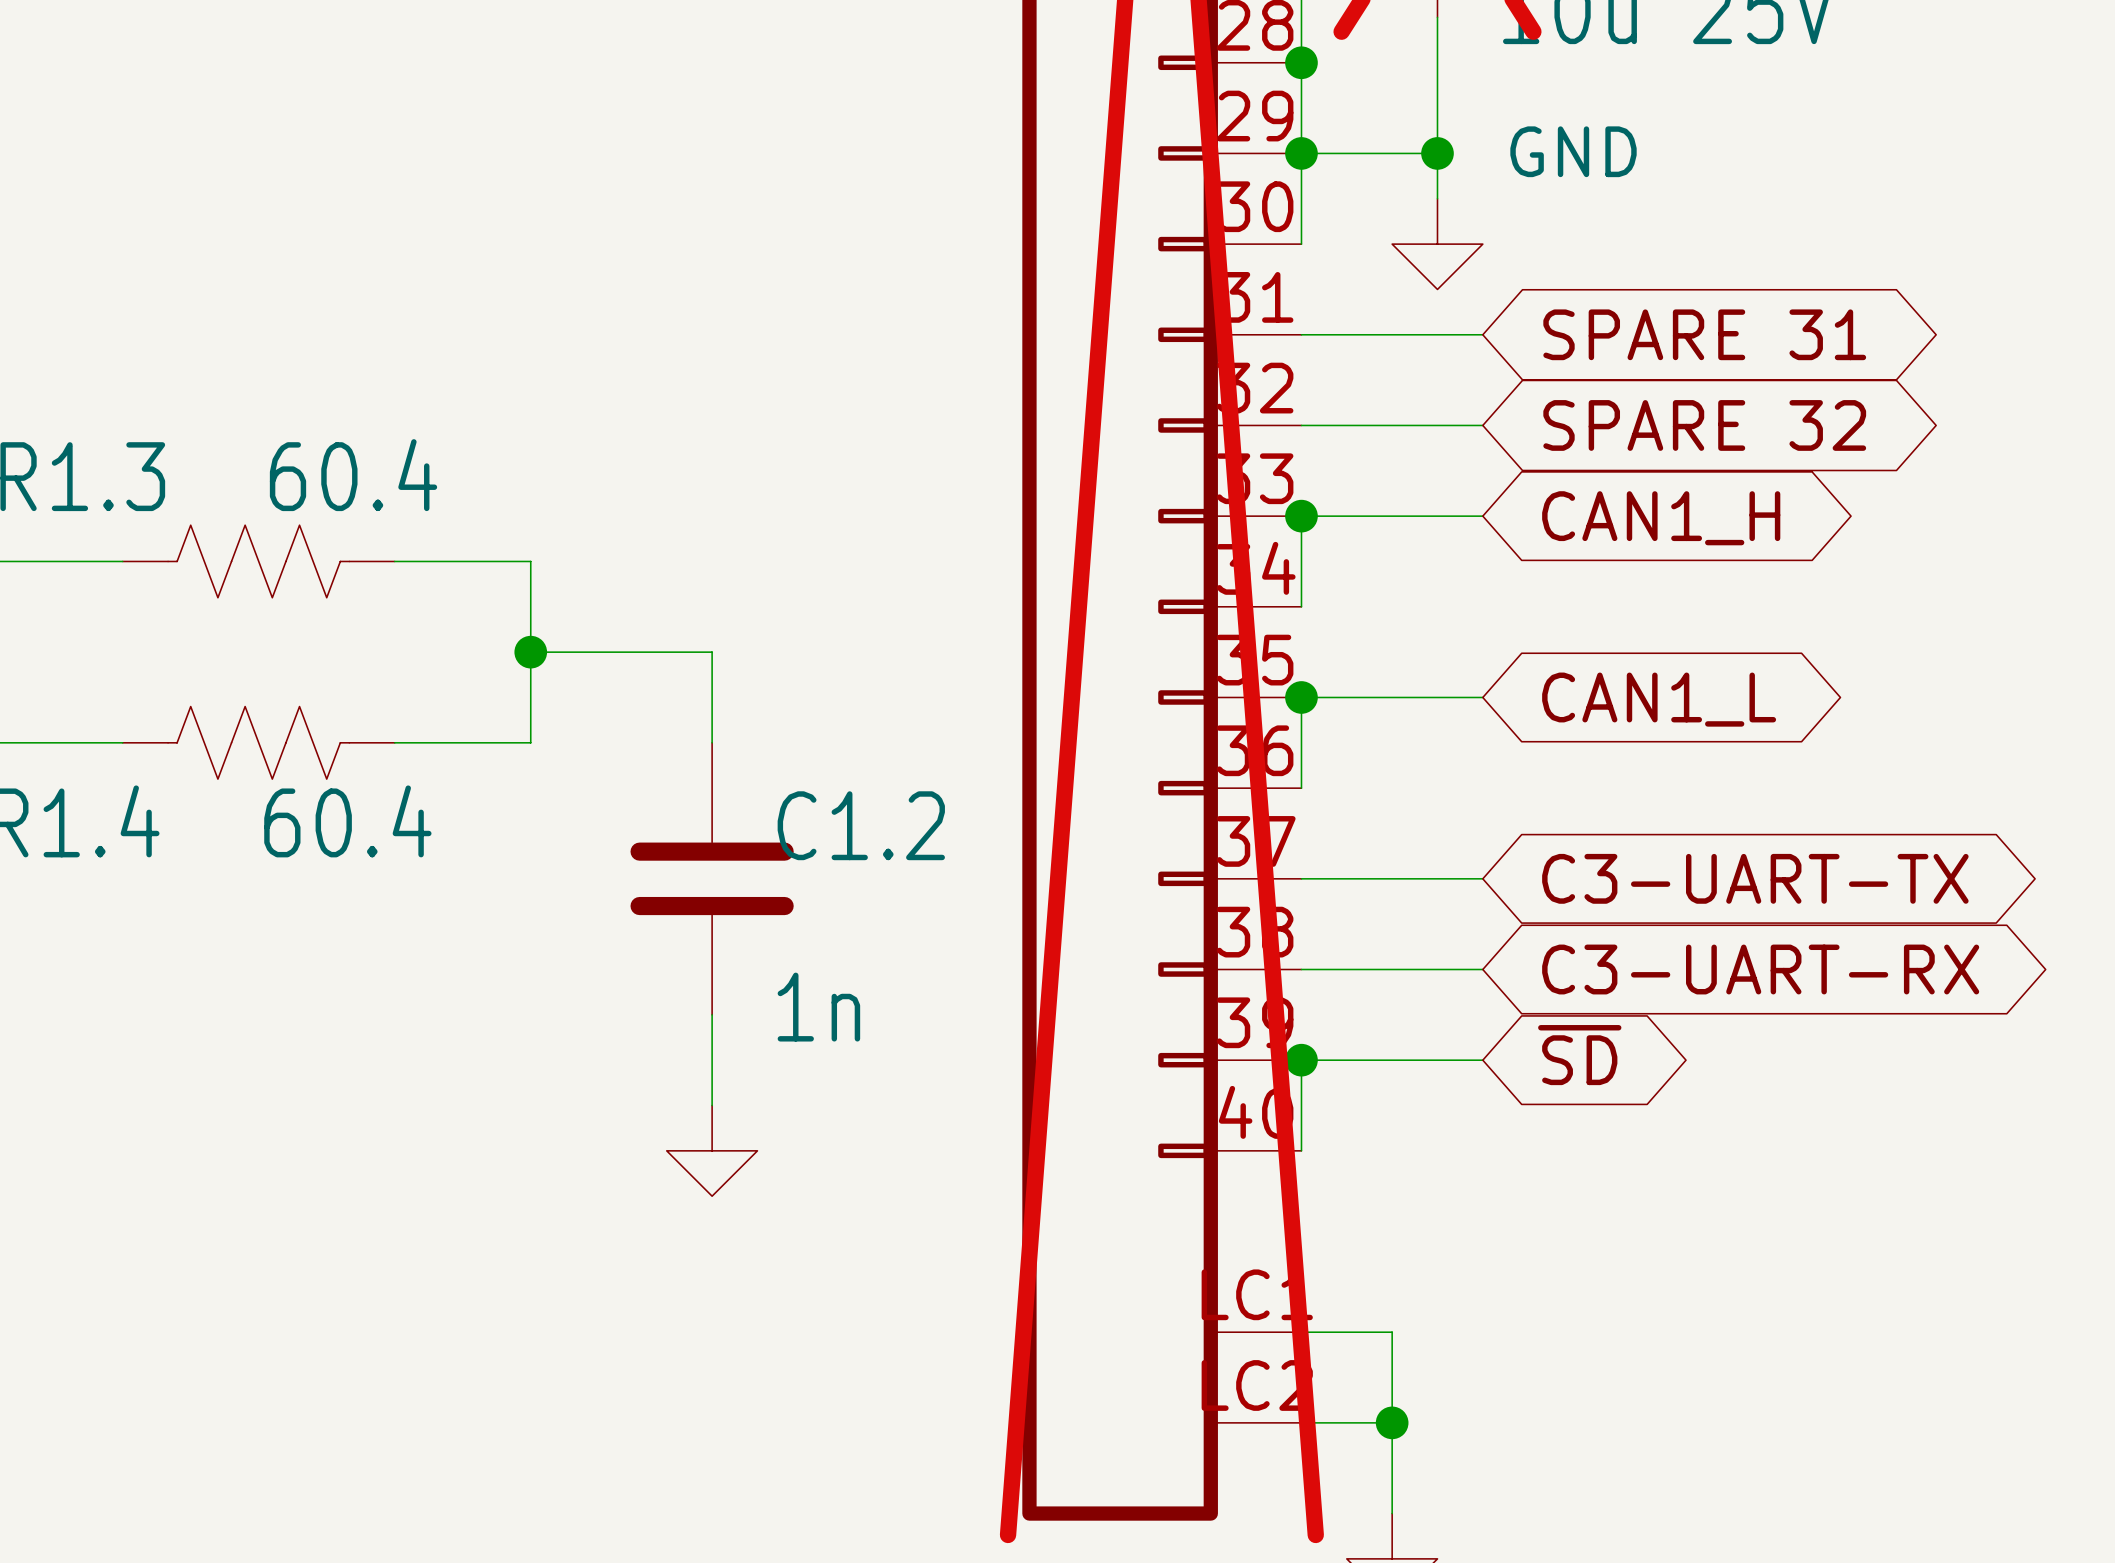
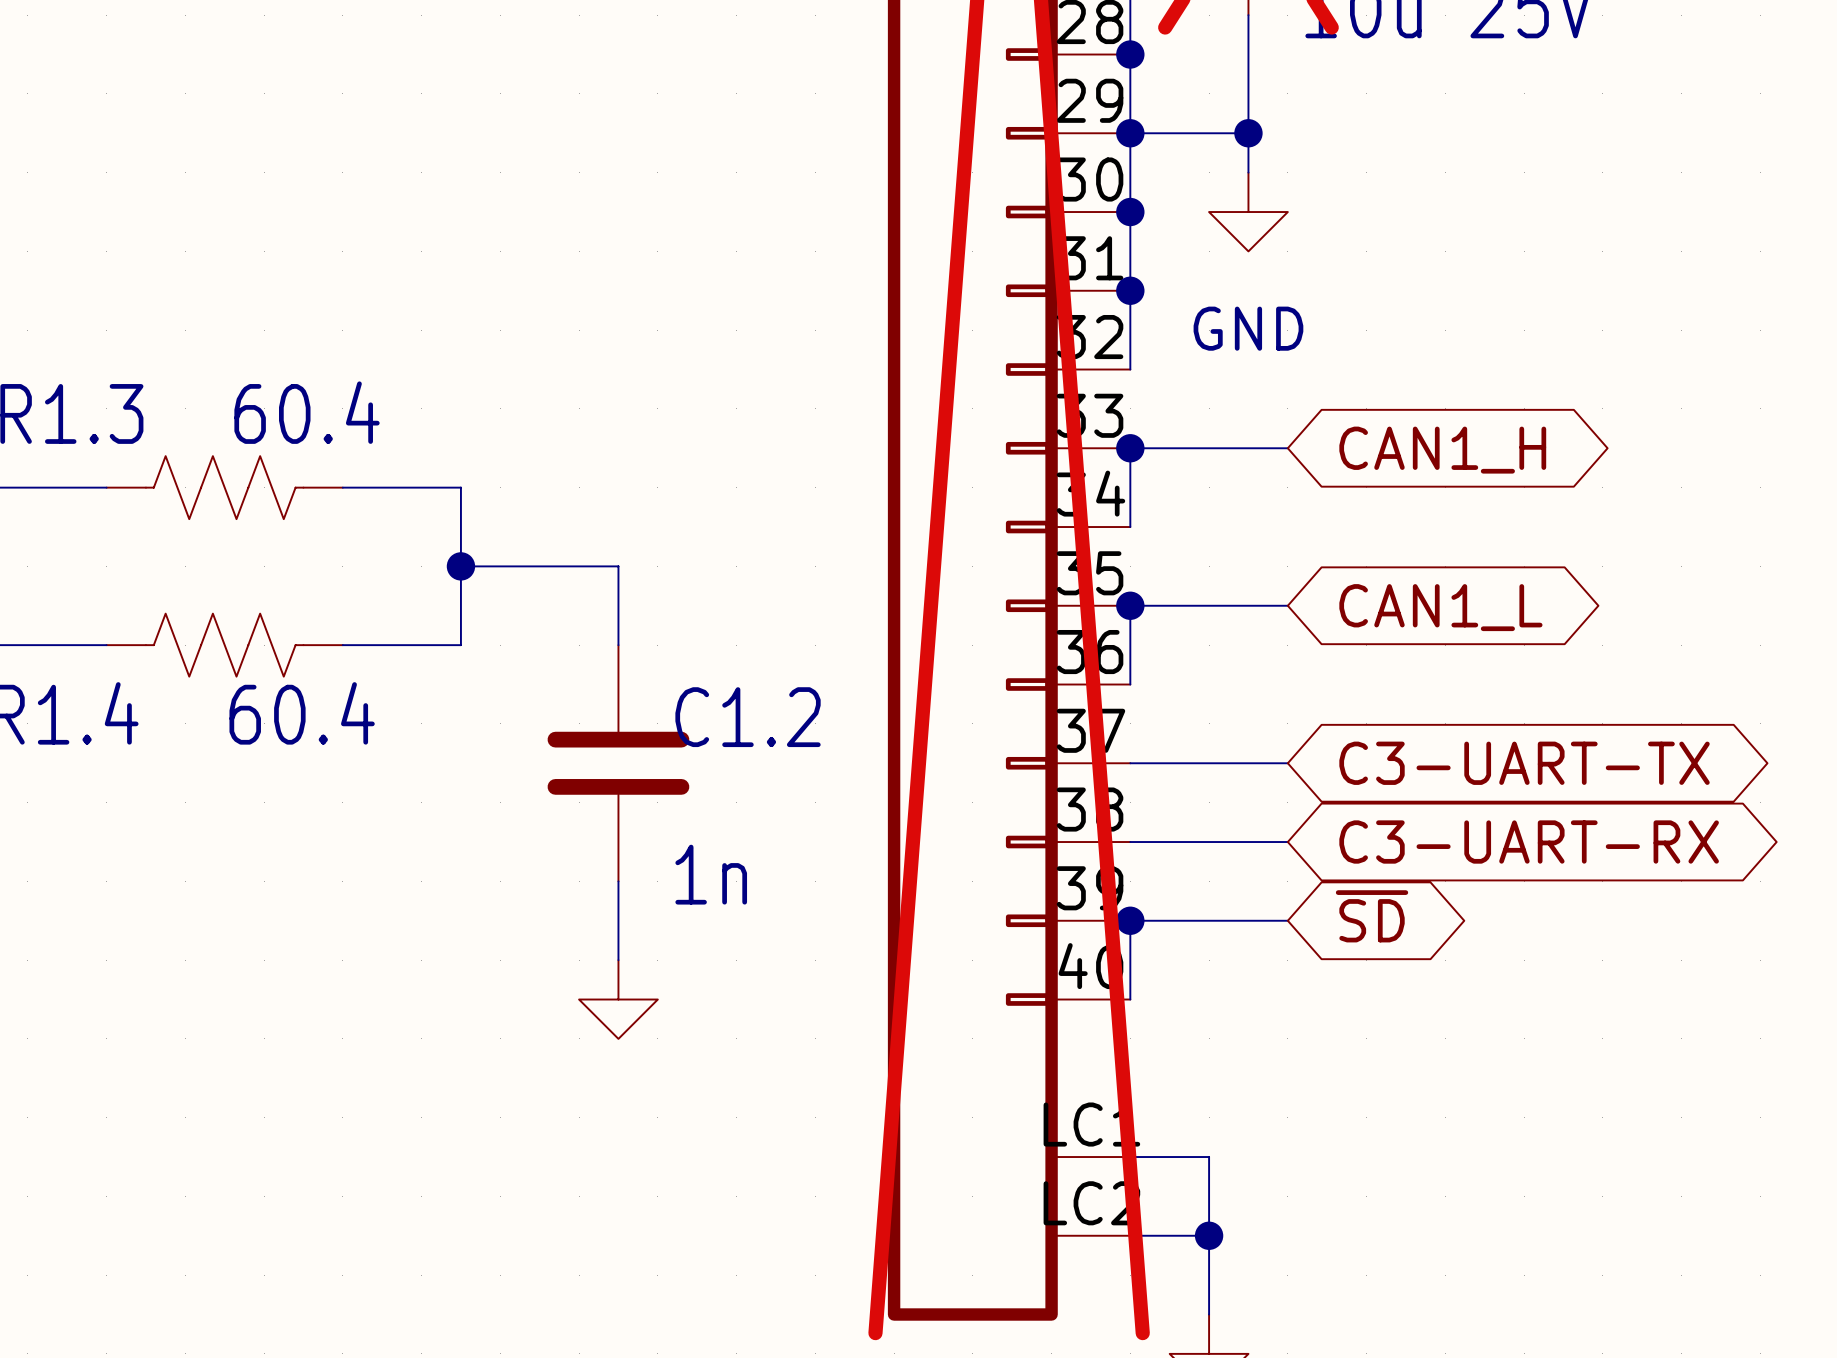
power symbol text position: GND (1573, 151) -> GND (1248, 328)
junction: none -> (1130, 212)
wire: (1301, 334) (1482, 334) -> none
junction: none -> (1130, 290)
global label: SPARE 31 (1704, 334) -> none
wire: (1301, 425) (1482, 425) -> (1130, 369) (1130, 212)
global label: SPARE 32 (1704, 425) -> none

